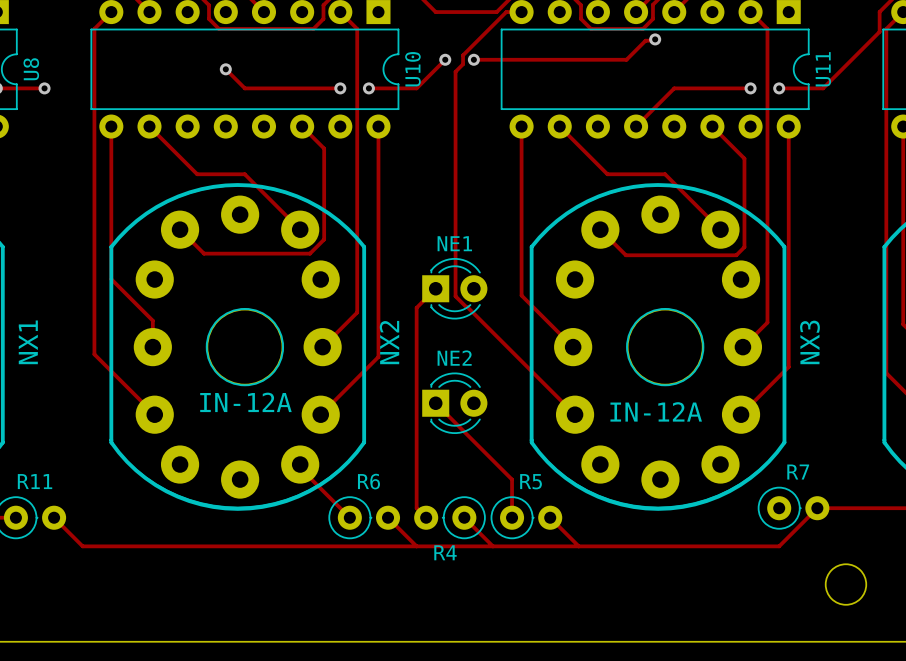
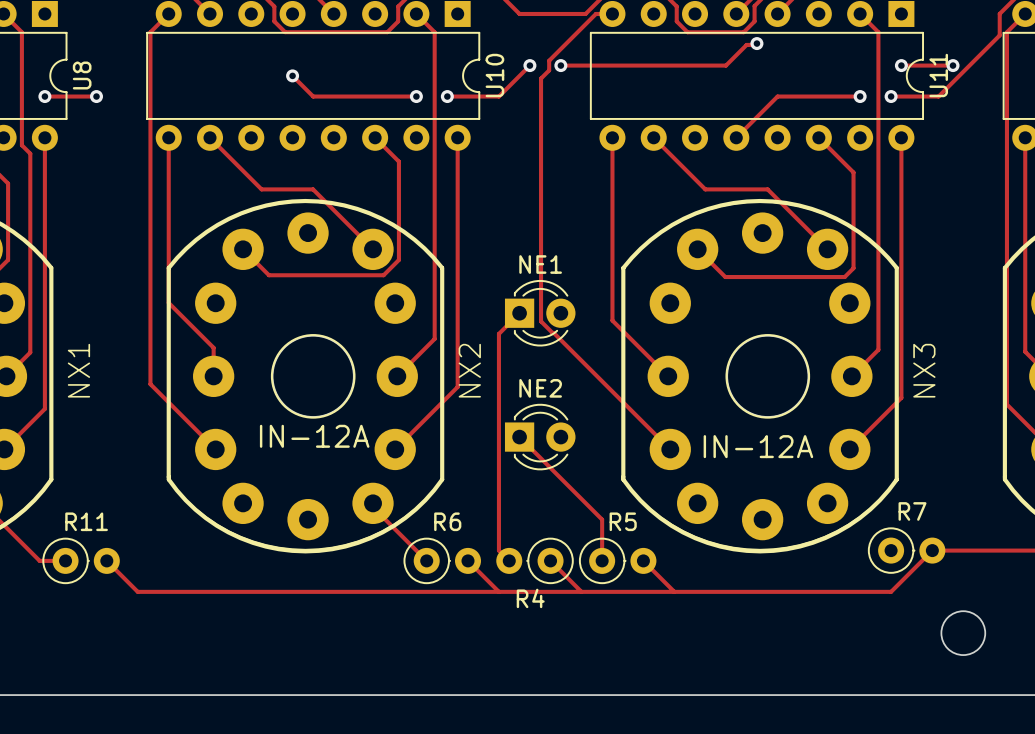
track: none -> (901, 65) (953, 65)
via: none -> (901, 65)
via: none -> (953, 65)

